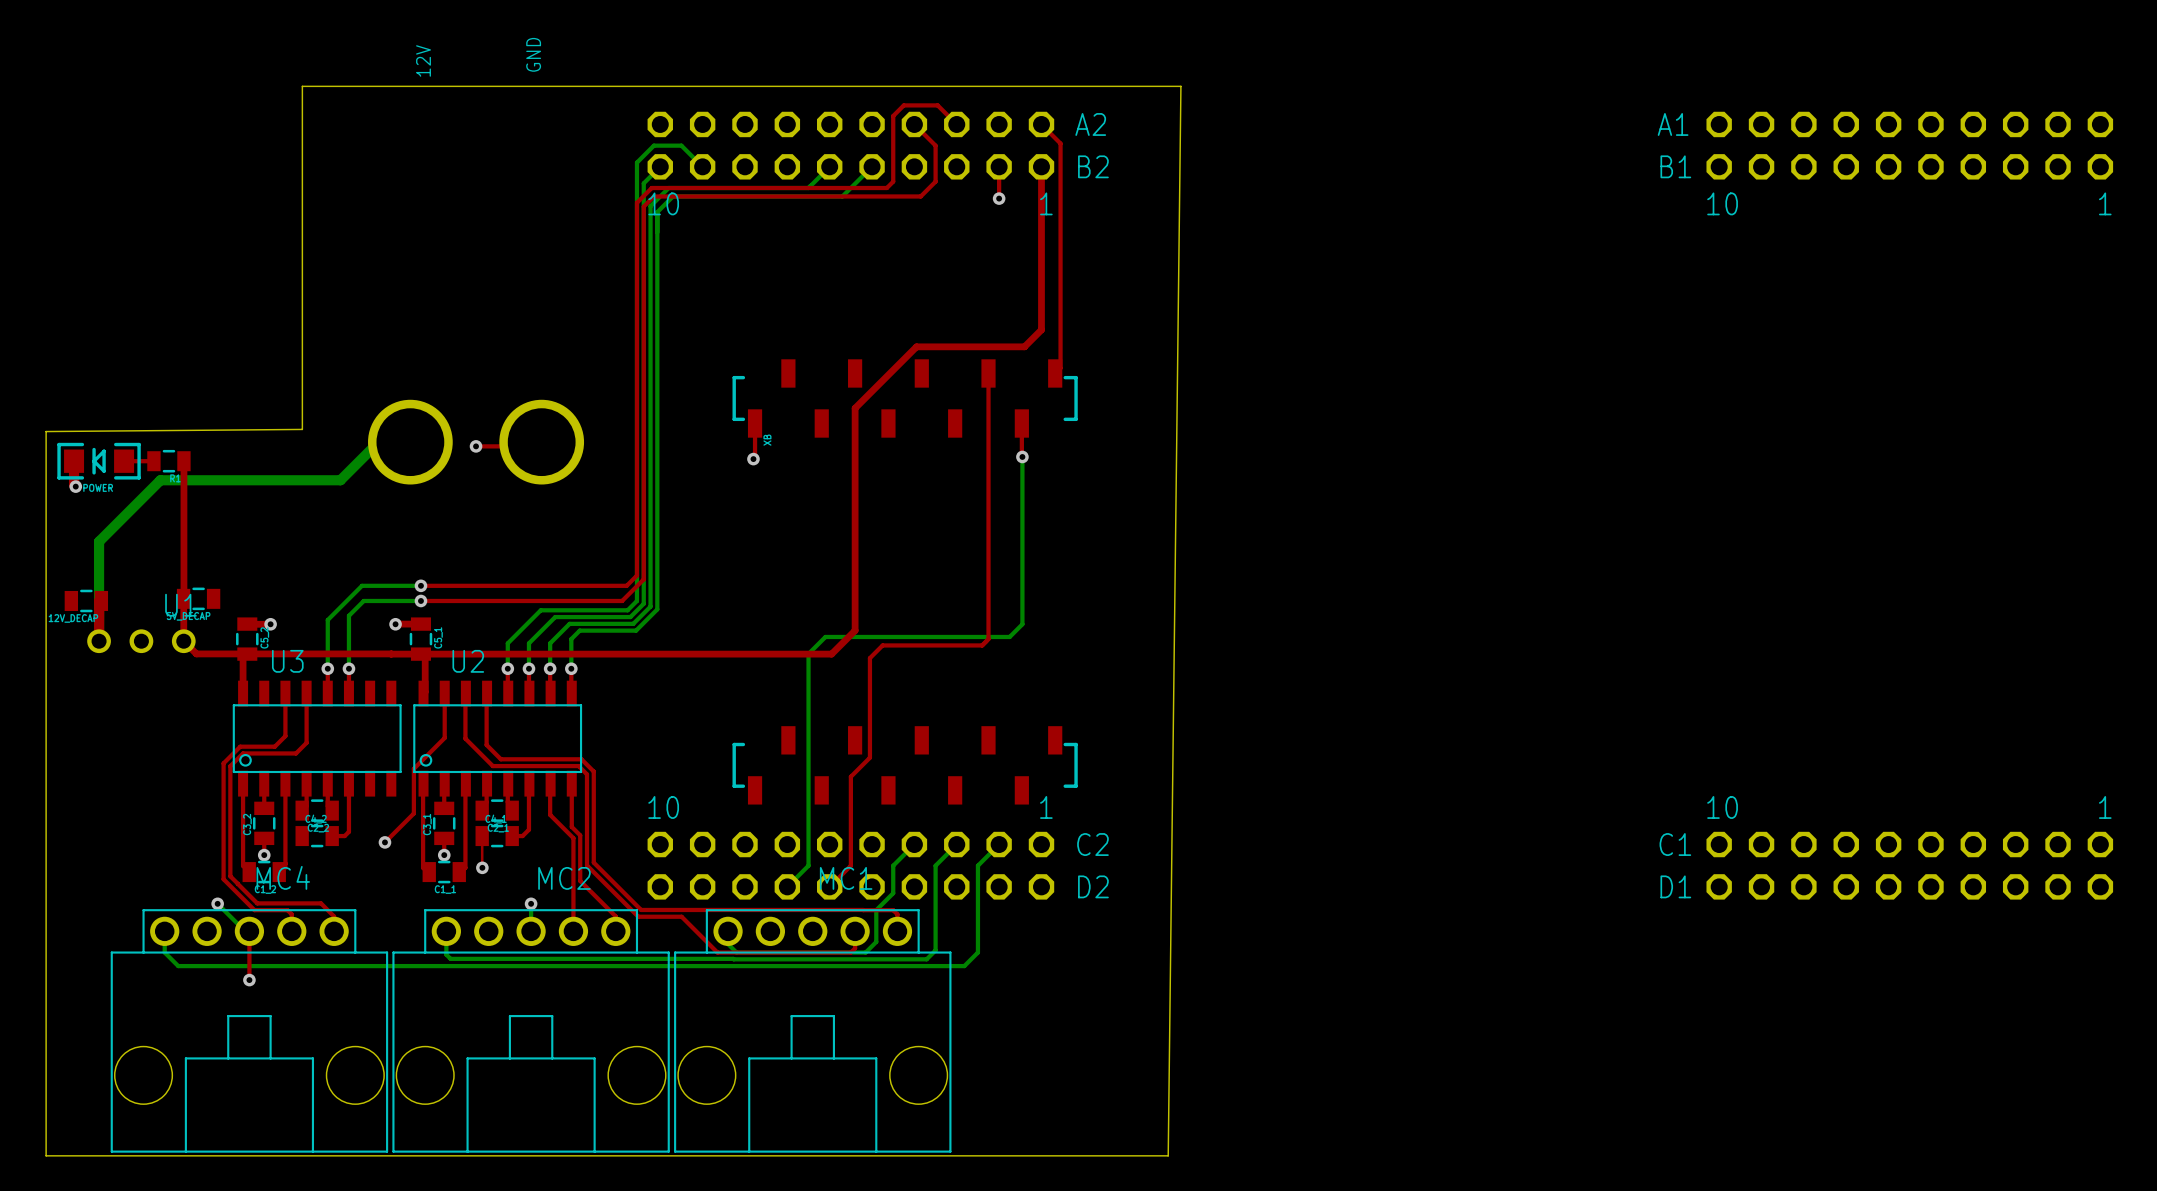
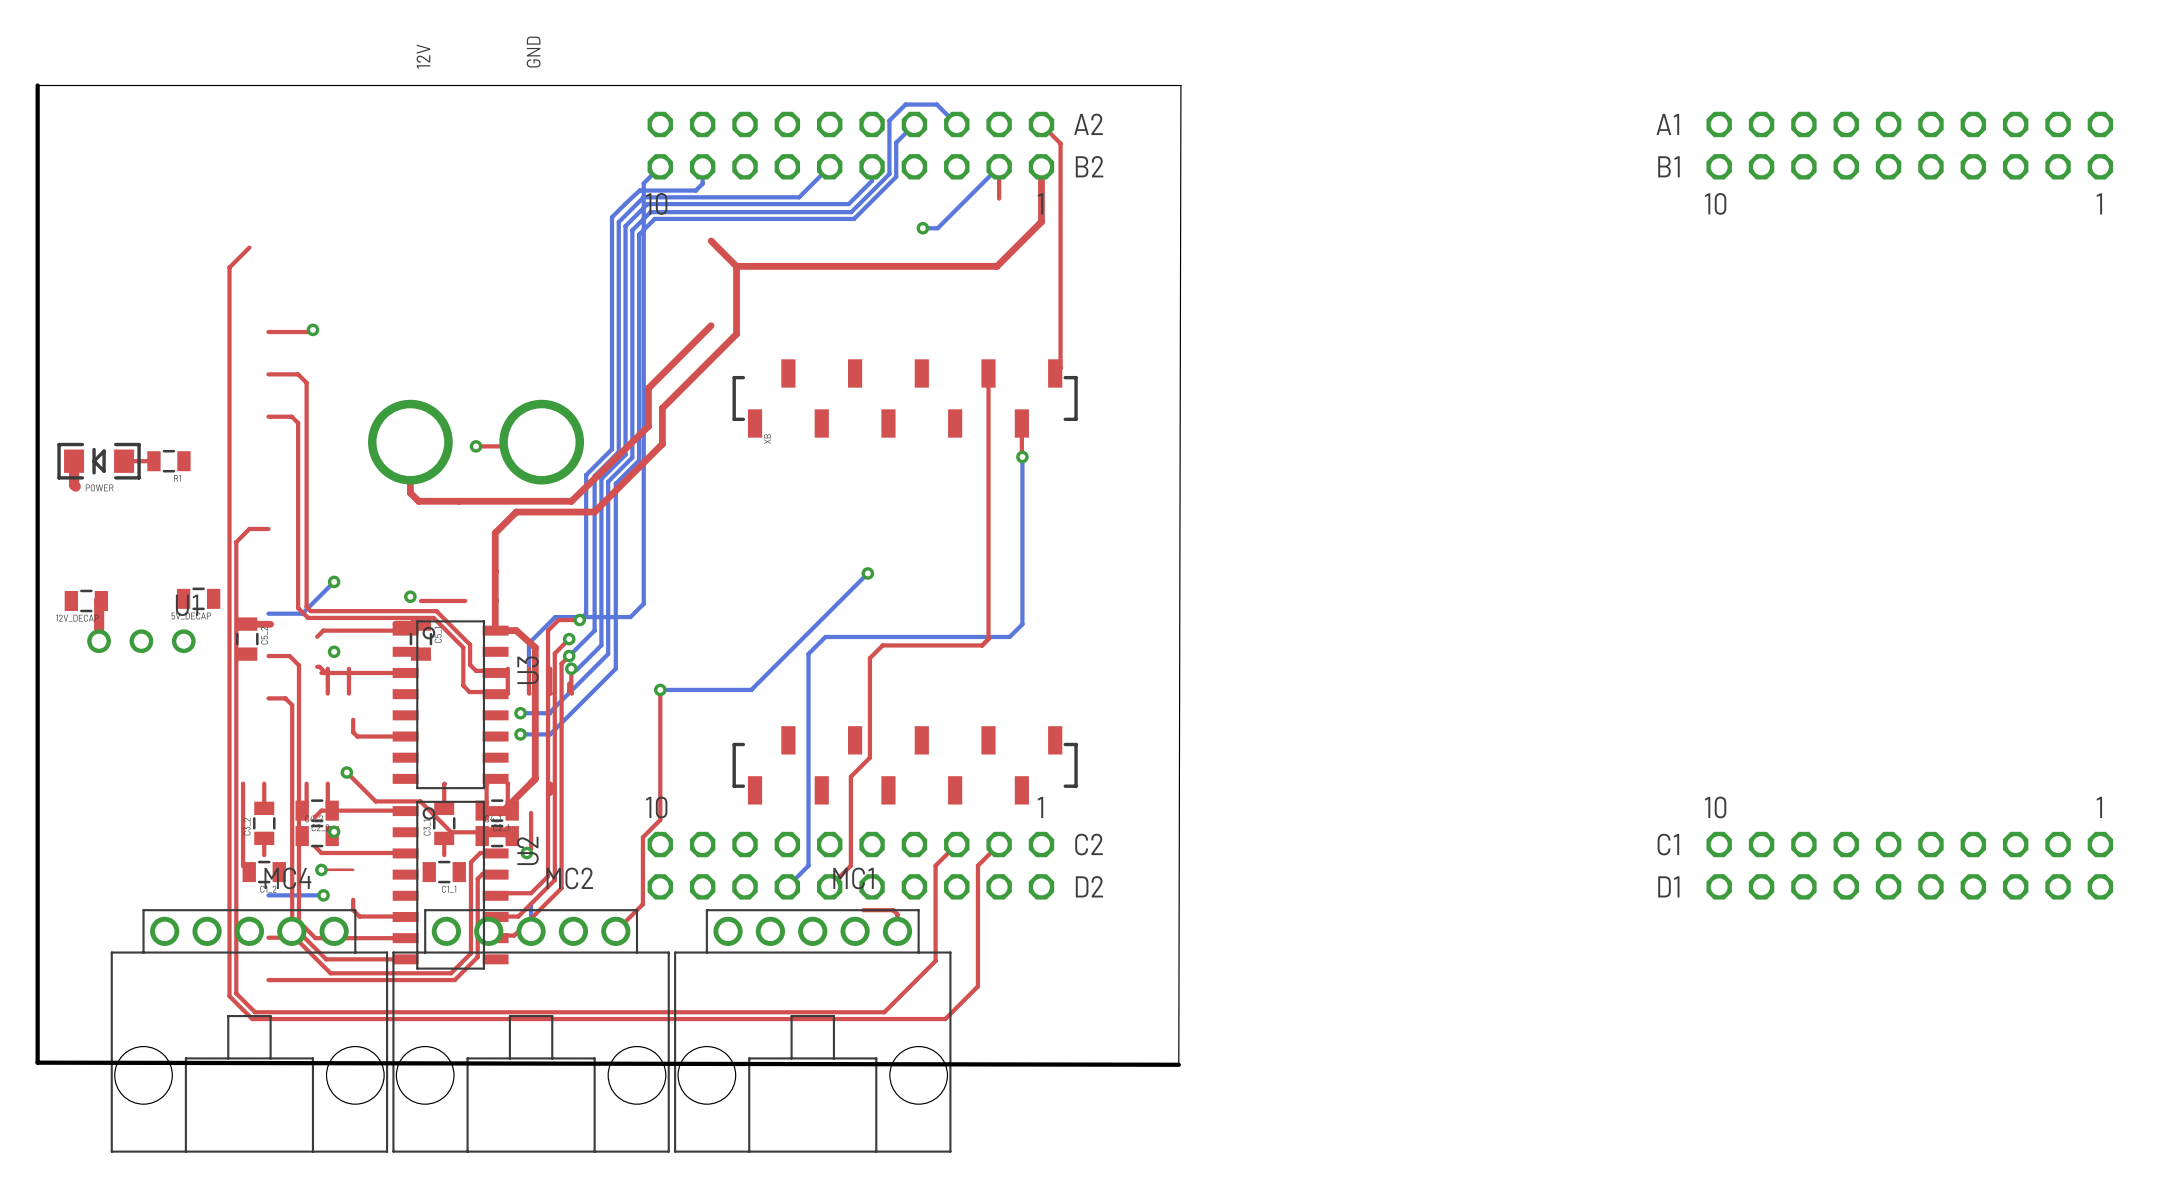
board edge: (302, 86) (1180, 86) (1168, 1155) (46, 1155) (46, 431) (302, 429) (302, 86) -> (37, 85) (37, 1062) (1178, 1064) (1180, 85) (37, 85)
top track: (914, 124) (935, 145) (935, 181) (920, 196) (653, 196) (643, 206) (643, 579) (622, 600) (465, 600) -> none
bottom track: none -> (914, 124) (896, 142) (896, 176) (854, 218) (654, 218) (639, 234) (639, 460) (615, 483) (615, 668) (550, 734) (520, 734)
top track: (956, 124) (937, 105) (903, 105) (893, 116) (893, 181) (886, 188) (651, 188) (636, 202) (636, 575) (626, 585) (420, 585) -> none
bottom track: none -> (956, 124) (936, 104) (905, 104) (889, 120) (889, 174) (851, 212) (650, 212) (632, 230) (632, 457) (608, 481) (608, 654) (550, 713) (520, 713)
bottom track: (702, 166) (681, 145) (653, 145) (636, 162) (636, 600) (627, 610) (540, 610) (507, 643) (507, 668) -> (702, 166) (702, 183) (695, 190) (639, 190) (611, 217) (611, 449) (586, 475) (586, 613) (579, 620)
bottom track: (872, 166) (842, 196) (672, 196) (657, 212) (657, 609) (636, 630) (579, 630) (571, 639) (571, 668) -> (872, 166) (872, 180) (848, 204) (647, 204) (625, 226) (625, 454) (601, 478) (601, 645) (576, 669)
bottom track: none -> (999, 166) (937, 228) (922, 228)
bottom track: (808, 188) (668, 188) (650, 206) (650, 606) (633, 623) (569, 623) (550, 643) (550, 668) -> (808, 188) (799, 197) (643, 197) (618, 222) (618, 451) (594, 476) (594, 630) (569, 656)
via position: (999, 198) -> (922, 228)
top track: (1041, 221) (1041, 329) (1024, 346) (916, 346) (855, 408) (855, 630) (831, 654) (391, 654) -> (1041, 221) (997, 266) (736, 266)
top track: none -> (711, 240) (736, 266)
top track: none -> (249, 247) (229, 267) (229, 996) (252, 1019) (945, 1019) (977, 986) (977, 865) (999, 844)
top track: none -> (736, 266) (736, 334) (662, 408) (662, 444) (594, 511)
top track: none -> (711, 325) (648, 388) (648, 426) (571, 501) (418, 501) (410, 492) (410, 442)
top track: none -> (312, 329) (310, 332) (268, 332)
via: none -> (312, 329)
top track: none -> (268, 374) (298, 374) (306, 382) (306, 606) (310, 611) (436, 611) (470, 644) (470, 664) (476, 670) (493, 670) (495, 672)
top track: none -> (268, 416) (291, 416) (298, 423) (298, 608) (308, 617) (433, 617) (463, 647) (463, 685) (469, 692) (495, 694)
top track: (755, 423) (755, 457) (753, 459) -> none
bottom track: (410, 442) (378, 442) (340, 480) (160, 480) (99, 541) (99, 641) -> none
via: (753, 459) -> none
top track: (183, 461) (183, 598) -> none
via: (75, 486) -> none
top track: none -> (594, 512) (516, 512) (495, 533) (495, 630) (516, 630) (535, 647) (535, 778) (503, 810) (495, 811)
top track: none -> (268, 528) (249, 528) (236, 542) (236, 993) (255, 1012) (884, 1012) (935, 961) (935, 865) (956, 844)
bottom track: none -> (867, 573) (751, 689) (660, 689)
via: none -> (867, 573)
bottom track: none -> (334, 581) (302, 613) (268, 613)
via: none -> (334, 581)
bottom track: (420, 585) (362, 585) (327, 620) (327, 668) -> none
via: (420, 585) -> none
via: none -> (410, 596)
top track: (183, 599) (183, 641) (196, 653) (391, 653) -> none
bottom track: (420, 600) (363, 600) (348, 615) (348, 668) -> none
via: (420, 600) -> none
top track: none -> (579, 620) (558, 620) (548, 630) (548, 876) (531, 893) (505, 893) (503, 895) (495, 895)
via: none -> (579, 620)
via: (270, 624) -> none
via: (395, 624) -> none
top track: none -> (405, 630) (323, 630) (317, 636)
top track: none -> (569, 639) (554, 653) (554, 880) (518, 916) (495, 916)
via: none -> (569, 639)
via: none -> (334, 651)
top track: (243, 653) (243, 693) -> none
top track: (425, 653) (425, 691) (423, 693) (423, 685) -> none
top track: none -> (268, 656) (289, 656) (298, 665) (298, 921) (315, 938) (405, 938)
top track: none -> (569, 656) (561, 663) (561, 888) (514, 935) (495, 938)
via: none -> (569, 656)
top track: none -> (317, 666) (325, 672)
via: (327, 668) -> none
via: (348, 668) -> none
via: (507, 668) -> none
via: (528, 668) -> none
via: (550, 668) -> none
top track: none -> (321, 672) (405, 672)
top track: none -> (660, 689) (660, 819) (642, 837) (642, 904) (609, 937)
via: none -> (660, 689)
top track: (285, 693) (285, 736) (274, 746) (240, 746) (223, 763) (223, 879) (254, 910) (287, 910) (291, 914) (291, 931) -> none
top track: (306, 693) (306, 742) (296, 753) (243, 753) (230, 766) (230, 876) (257, 903) (321, 903) (334, 916) (334, 931) -> none
top track: (444, 693) (444, 737) (413, 768) (413, 813) (384, 842) -> none
top track: (465, 693) (465, 738) (492, 766) (578, 766) (587, 774) (587, 865) (638, 916) (681, 916) (717, 952) (850, 952) (855, 948) (855, 931) -> none
top track: (487, 693) (486, 744) (500, 759) (581, 759) (593, 771) (593, 862) (641, 909) (863, 909) -> none
top track: none -> (268, 698) (285, 698) (292, 705) (292, 925) (326, 959) (405, 959)
via: none -> (520, 713)
top track: none -> (353, 719) (353, 732) (357, 736) (405, 736)
via: none -> (520, 734)
U3 rotation: 0° (317, 738) -> 90° clockwise (450, 704)
U3 position: (317, 738) -> (450, 704)
U2 rotation: 0° (497, 738) -> 90° clockwise (450, 885)
U2 position: (497, 738) -> (450, 885)
top track: none -> (346, 772) (375, 801) (420, 801) (451, 832) (495, 832)
via: none -> (346, 772)
top track: (285, 783) (285, 867) -> none
top track: (348, 783) (348, 831) (344, 836) (332, 836) -> none
top track: (423, 783) (423, 867) (429, 873) (429, 872) -> none
top track: (465, 783) (465, 867) (459, 873) (459, 872) -> none
top track: (529, 783) (528, 829) (522, 836) (512, 836) -> none
top track: (571, 783) (571, 826) (580, 835) (580, 880) (615, 916) (615, 931) -> none
top track: (550, 785) (550, 814) (573, 838) (573, 931) -> none
top track: none -> (405, 811) (321, 810) (315, 816)
top track: none -> (531, 812) (531, 848) (526, 853)
via: none -> (334, 831)
top track: (482, 836) (482, 867) -> none
via: (384, 842) -> none
bottom track: (914, 844) (893, 865) (893, 893) (876, 910) (876, 941) (865, 952) (736, 952) (728, 944) (728, 931) -> none
bottom track: (956, 844) (935, 865) (935, 950) (926, 959) (450, 958) (446, 954) (446, 931) -> none
bottom track: (999, 844) (977, 865) (977, 952) (964, 966) (178, 966) (164, 952) (164, 931) -> none
top track: none -> (315, 846) (321, 853) (405, 853)
top track: none -> (495, 853) (480, 853) (470, 862) (470, 953) (451, 973) (330, 973) (294, 937) (268, 937)
via: none -> (526, 853)
via: (264, 855) -> none
via: (444, 855) -> none
via: (482, 867) -> none
top track: none -> (321, 869) (353, 869)
via: none -> (321, 869)
top track: none -> (495, 874) (482, 874) (477, 878) (477, 957) (454, 980) (268, 980)
bottom track: none -> (268, 895) (323, 895)
via: none -> (323, 895)
top track: none -> (353, 899) (353, 910) (359, 916) (405, 916)
bottom track: (217, 903) (245, 931) (249, 931) -> none
via: (217, 903) -> none
via: (531, 903) -> none
top track: (249, 931) (249, 980) -> none
via: (249, 980) -> none

